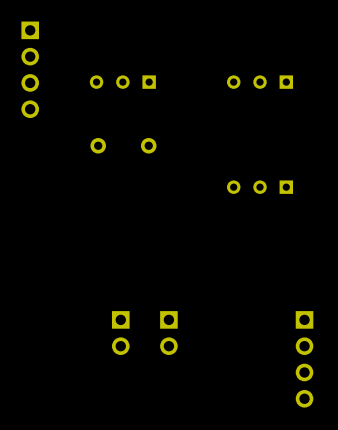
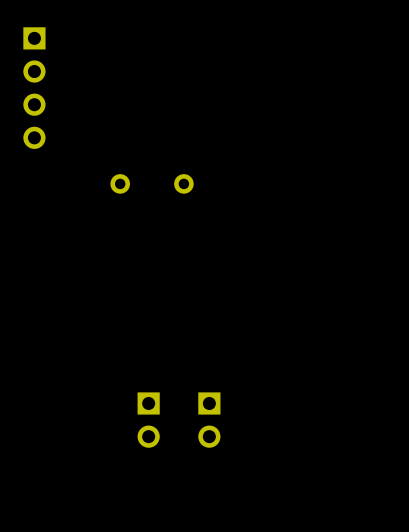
part: (122, 82) -> none
part: (260, 82) -> none
part: (260, 187) -> none
part: (304, 359) -> none

